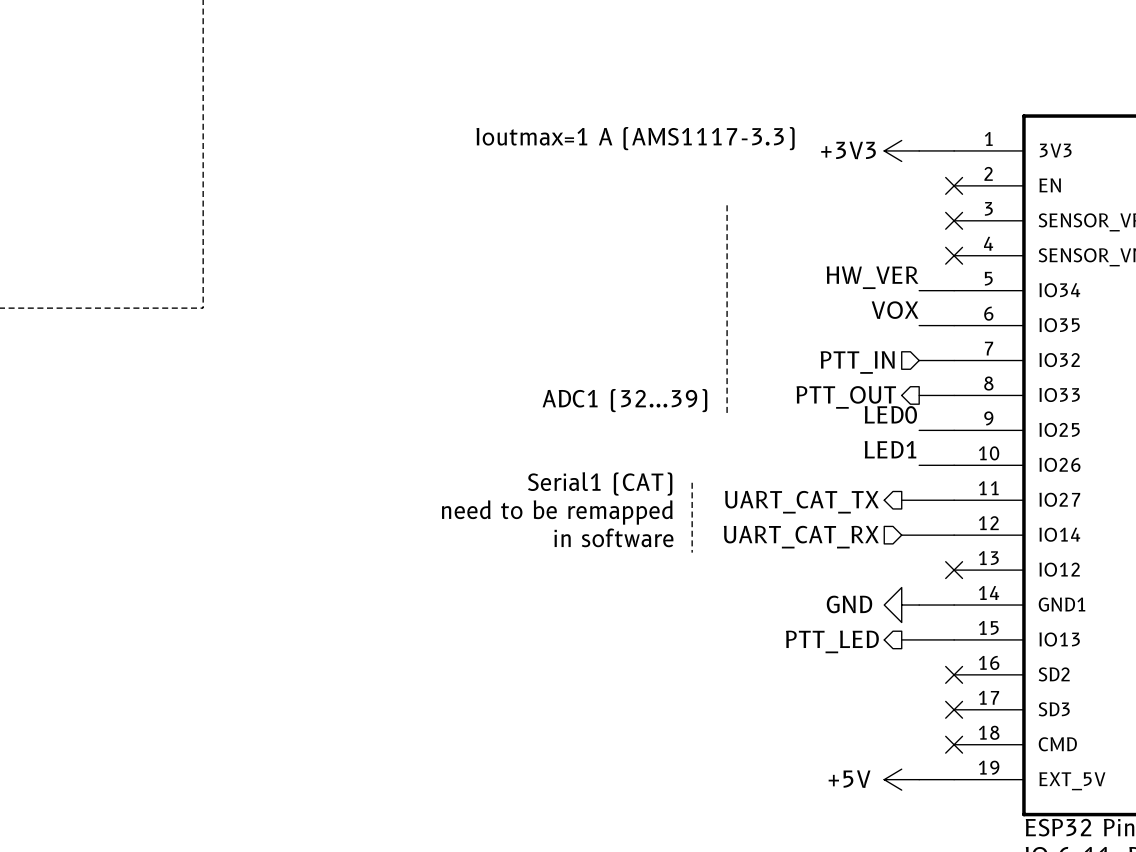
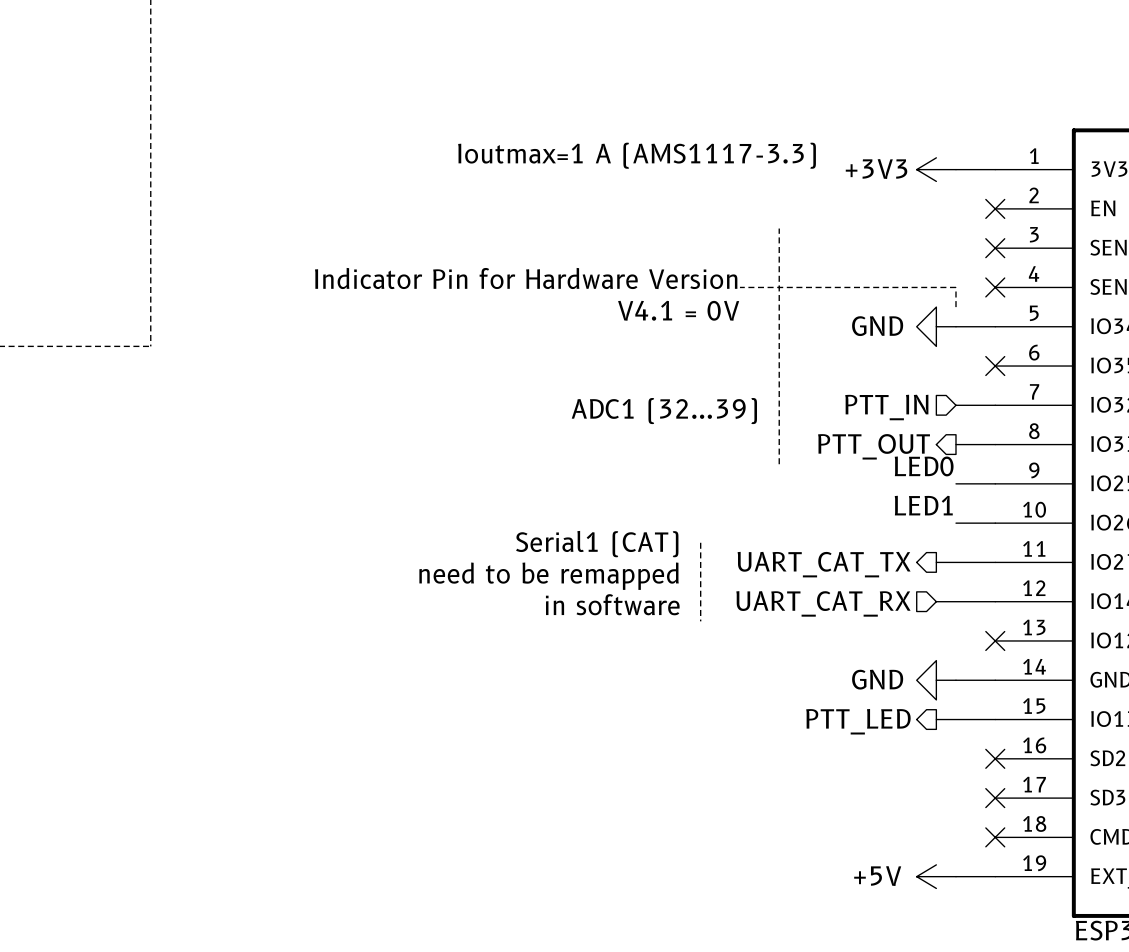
line: (727, 203) (727, 412) -> (779, 228) (779, 464)
text: none -> Indicator Pin for Hardware Version (526, 278)
line: none -> (739, 287) (955, 287) (955, 307)
text: none -> V4.1 = 0V (678, 310)
label: HW_VER (872, 277) -> none
power symbol: none -> GND (936, 326)
label: VOX (895, 310) -> none
wire: (919, 325) (954, 325) -> none
no-connect mark: none -> (995, 366)
text position: ADC1 (32...39) (624, 400) -> ADC1 (32...39) (664, 411)

